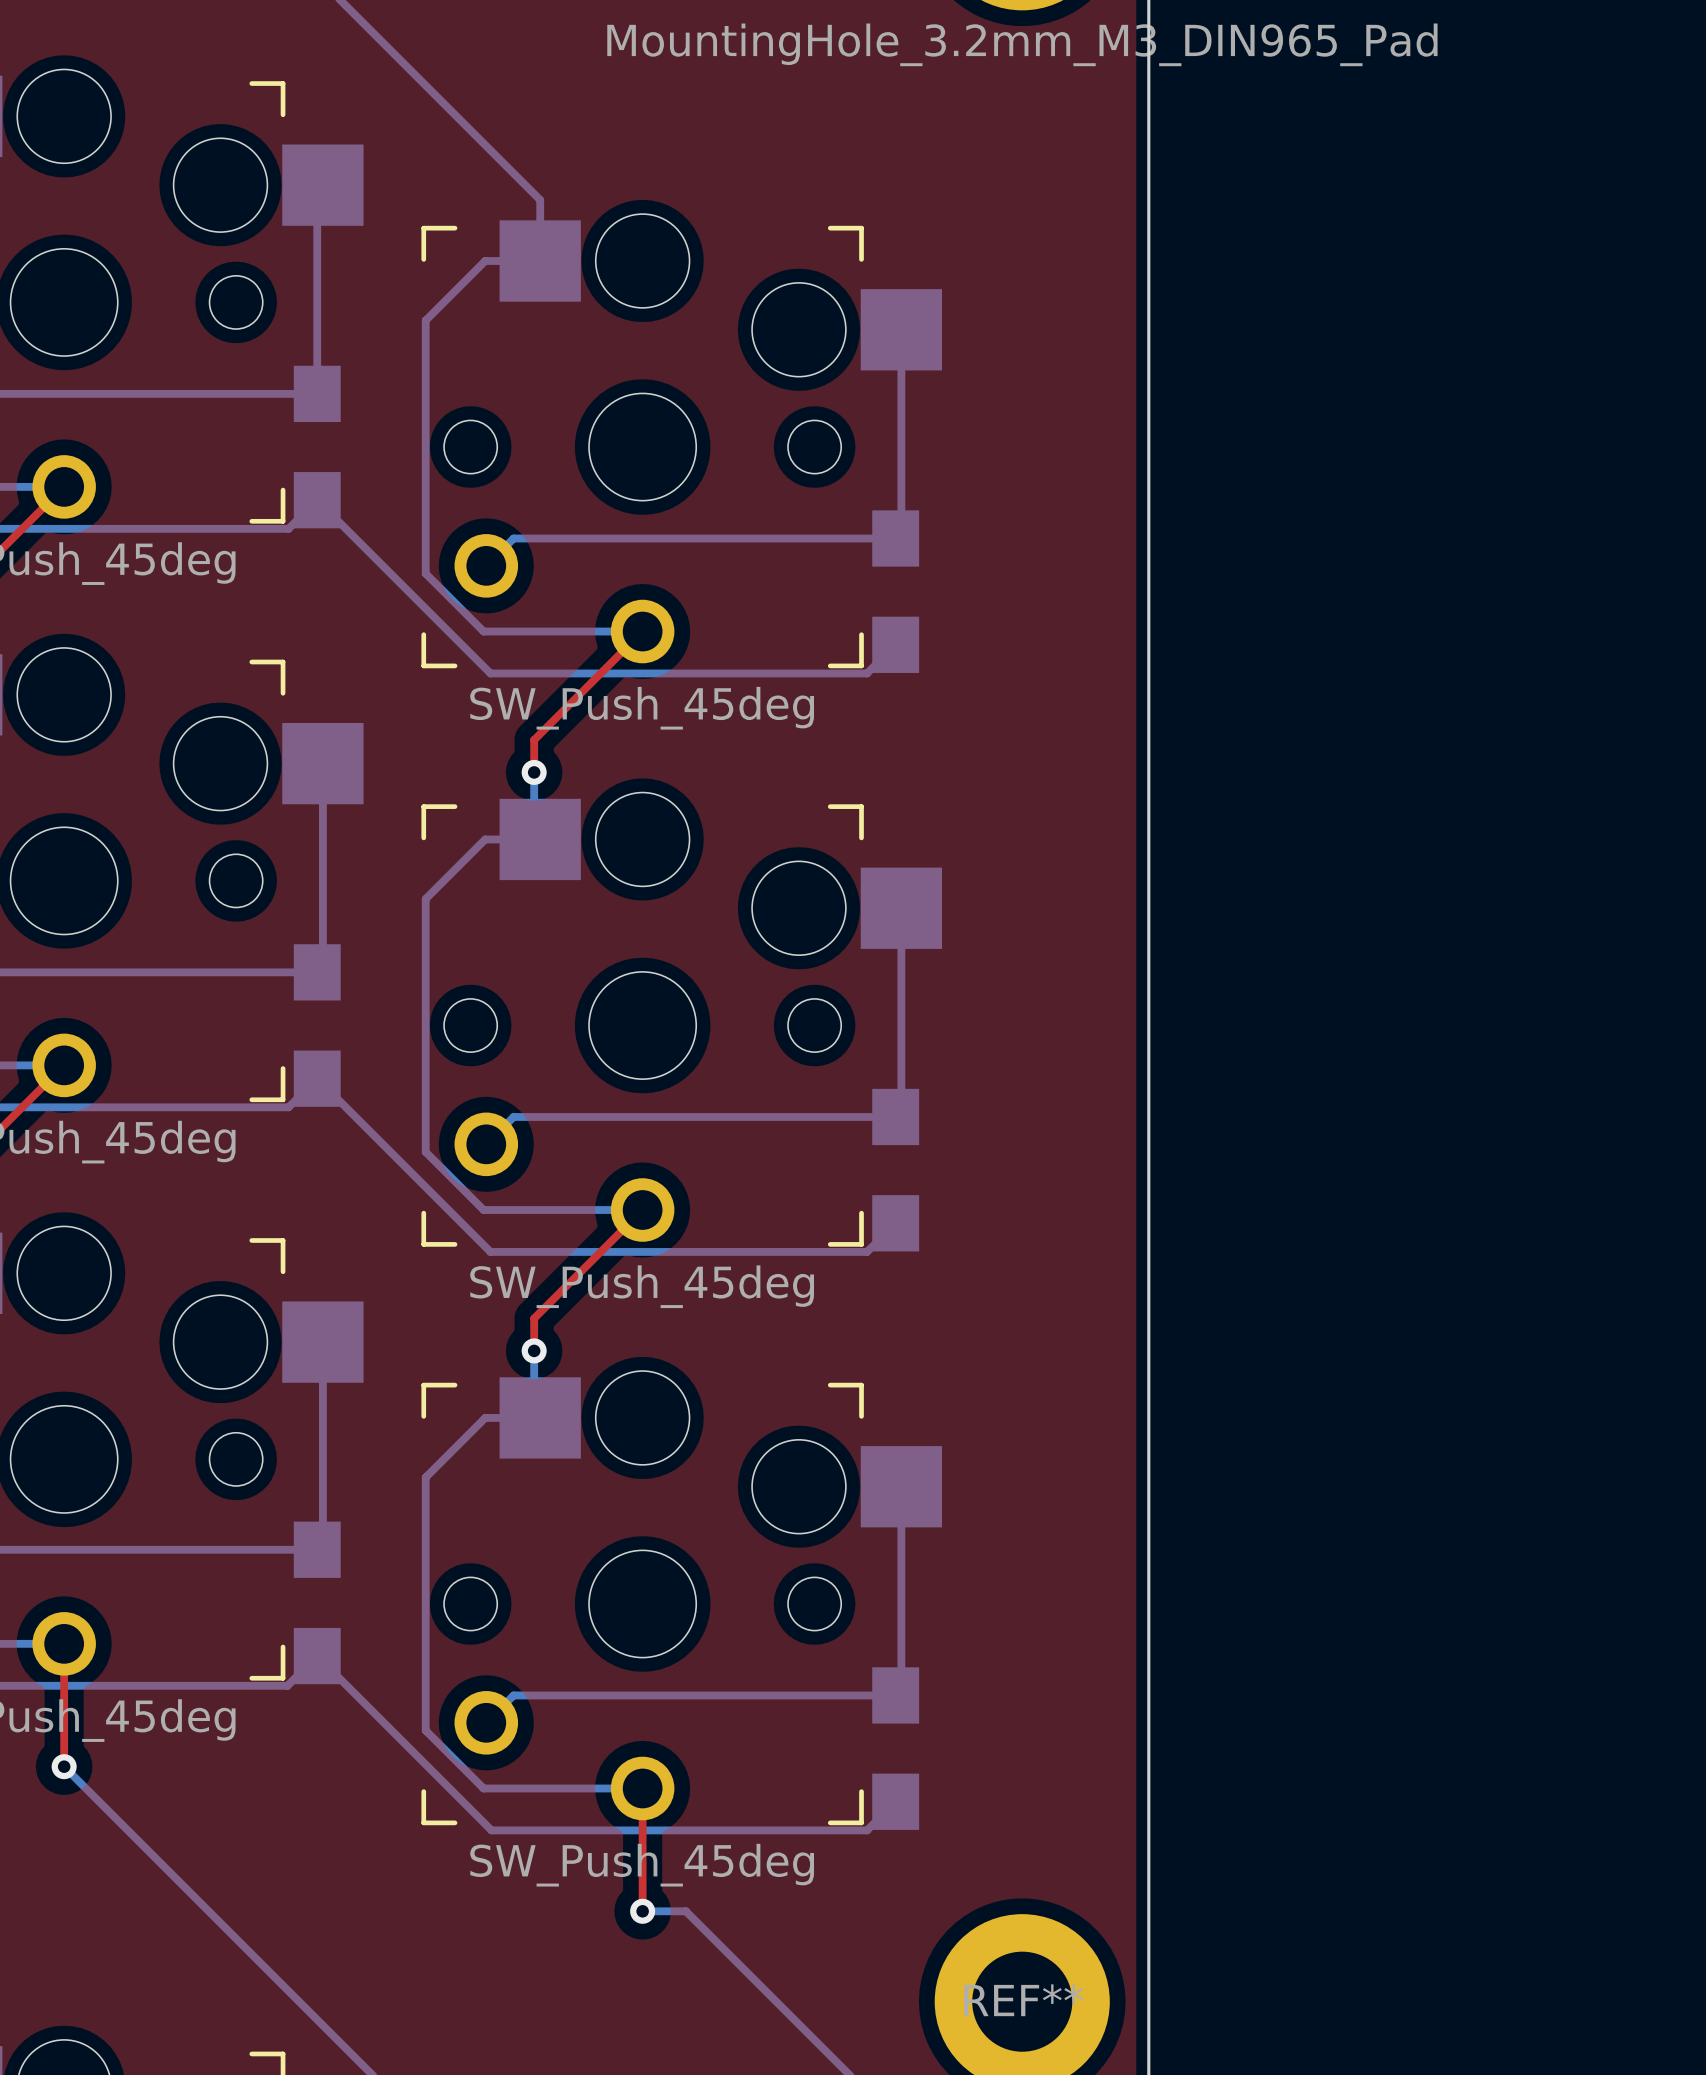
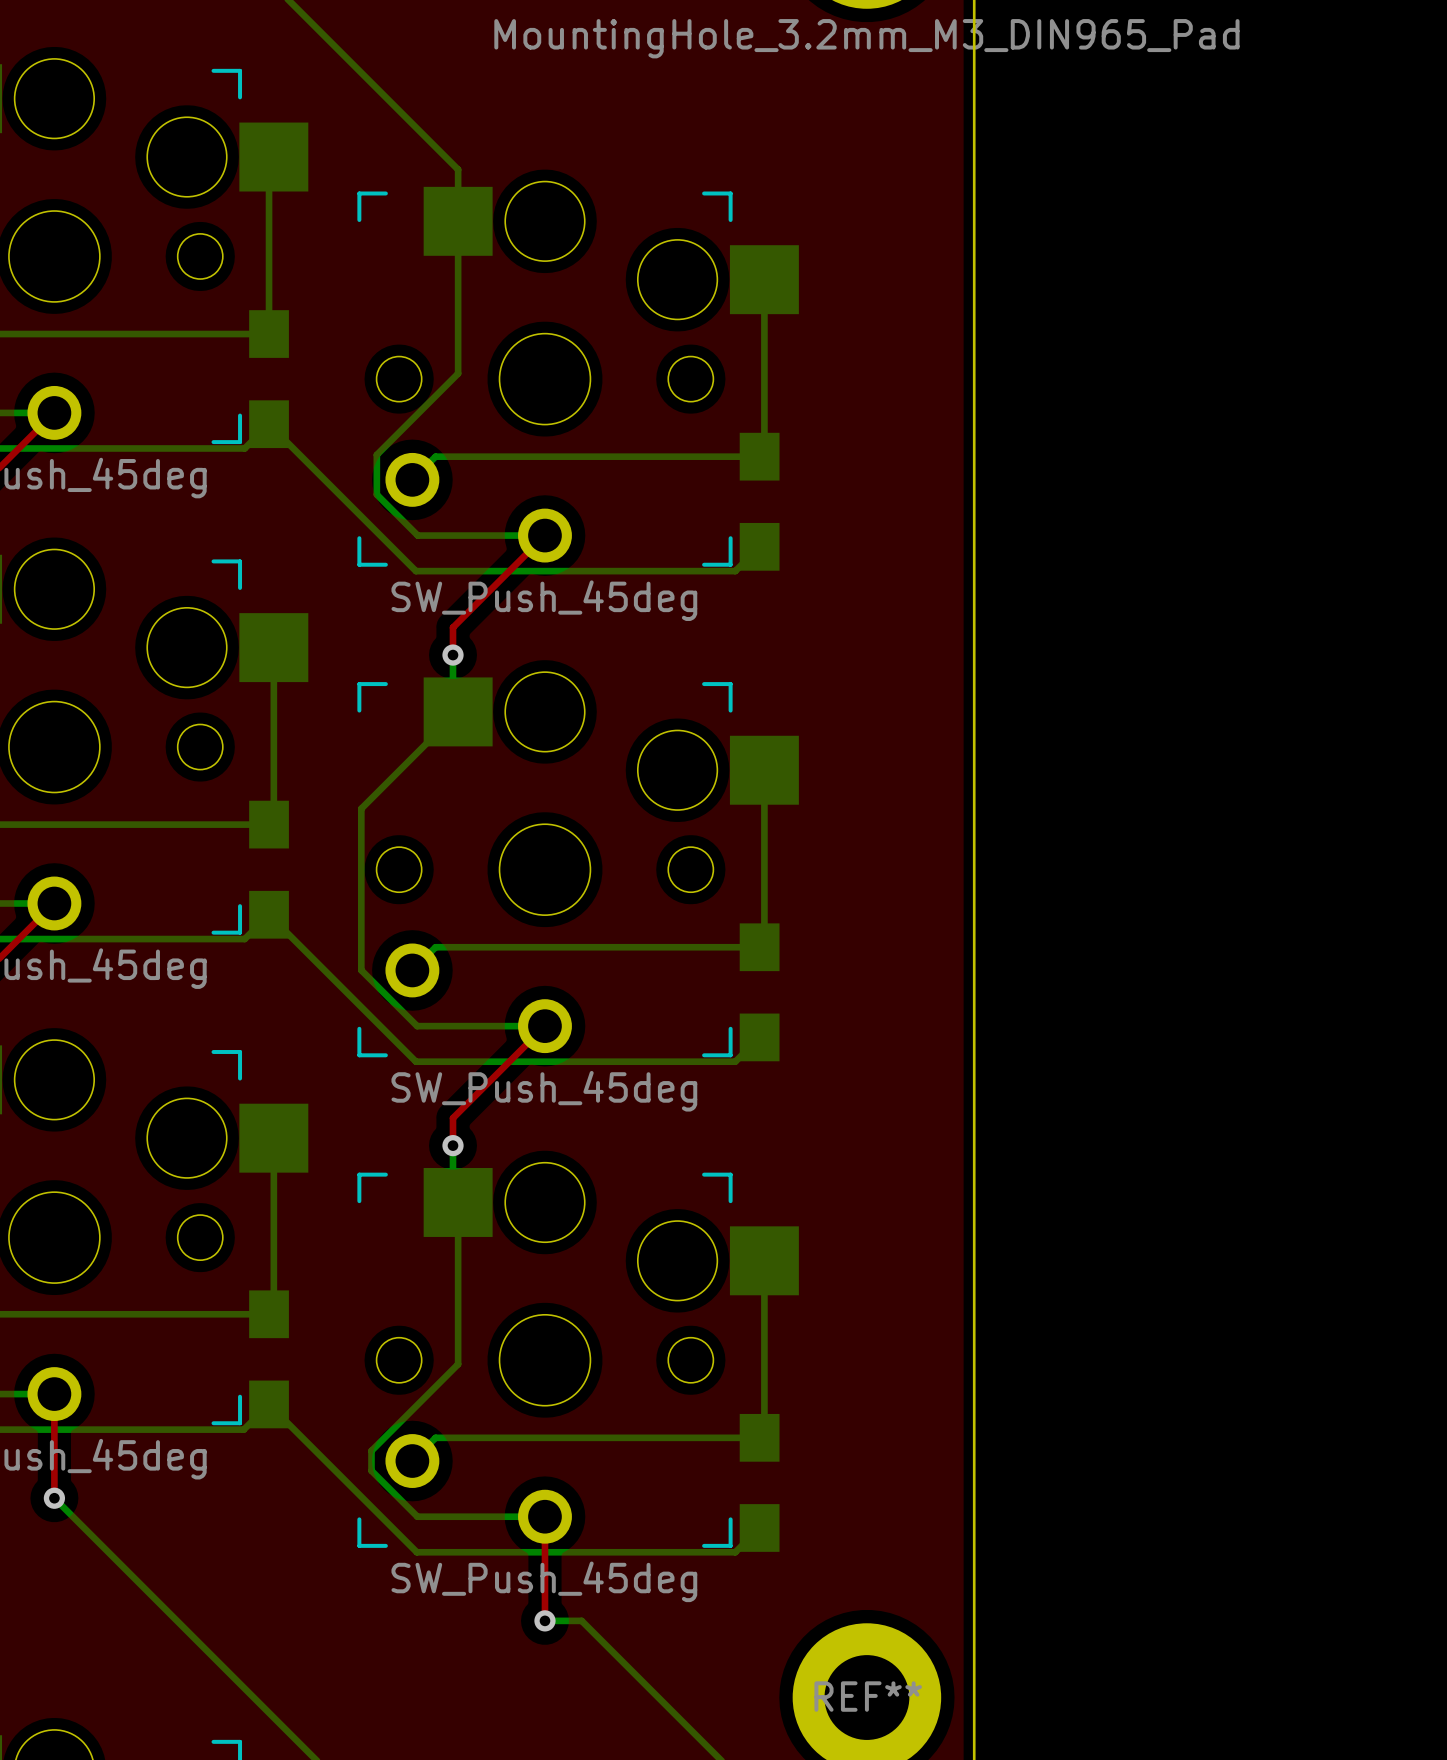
bottom track: (540, 260) (485, 260) (425, 320) (425, 573) (483, 631) (492, 631) -> (458, 221) (458, 373) (376, 454) (376, 494) (417, 535)
bottom track: (540, 839) (485, 839) (425, 898) (425, 1152) (483, 1210) (491, 1210) -> (458, 711) (361, 808) (361, 970) (417, 1026)
bottom track: (540, 1417) (485, 1417) (425, 1477) (425, 1730) (483, 1788) (492, 1788) -> (458, 1202) (458, 1364) (371, 1450) (371, 1470) (417, 1516)

